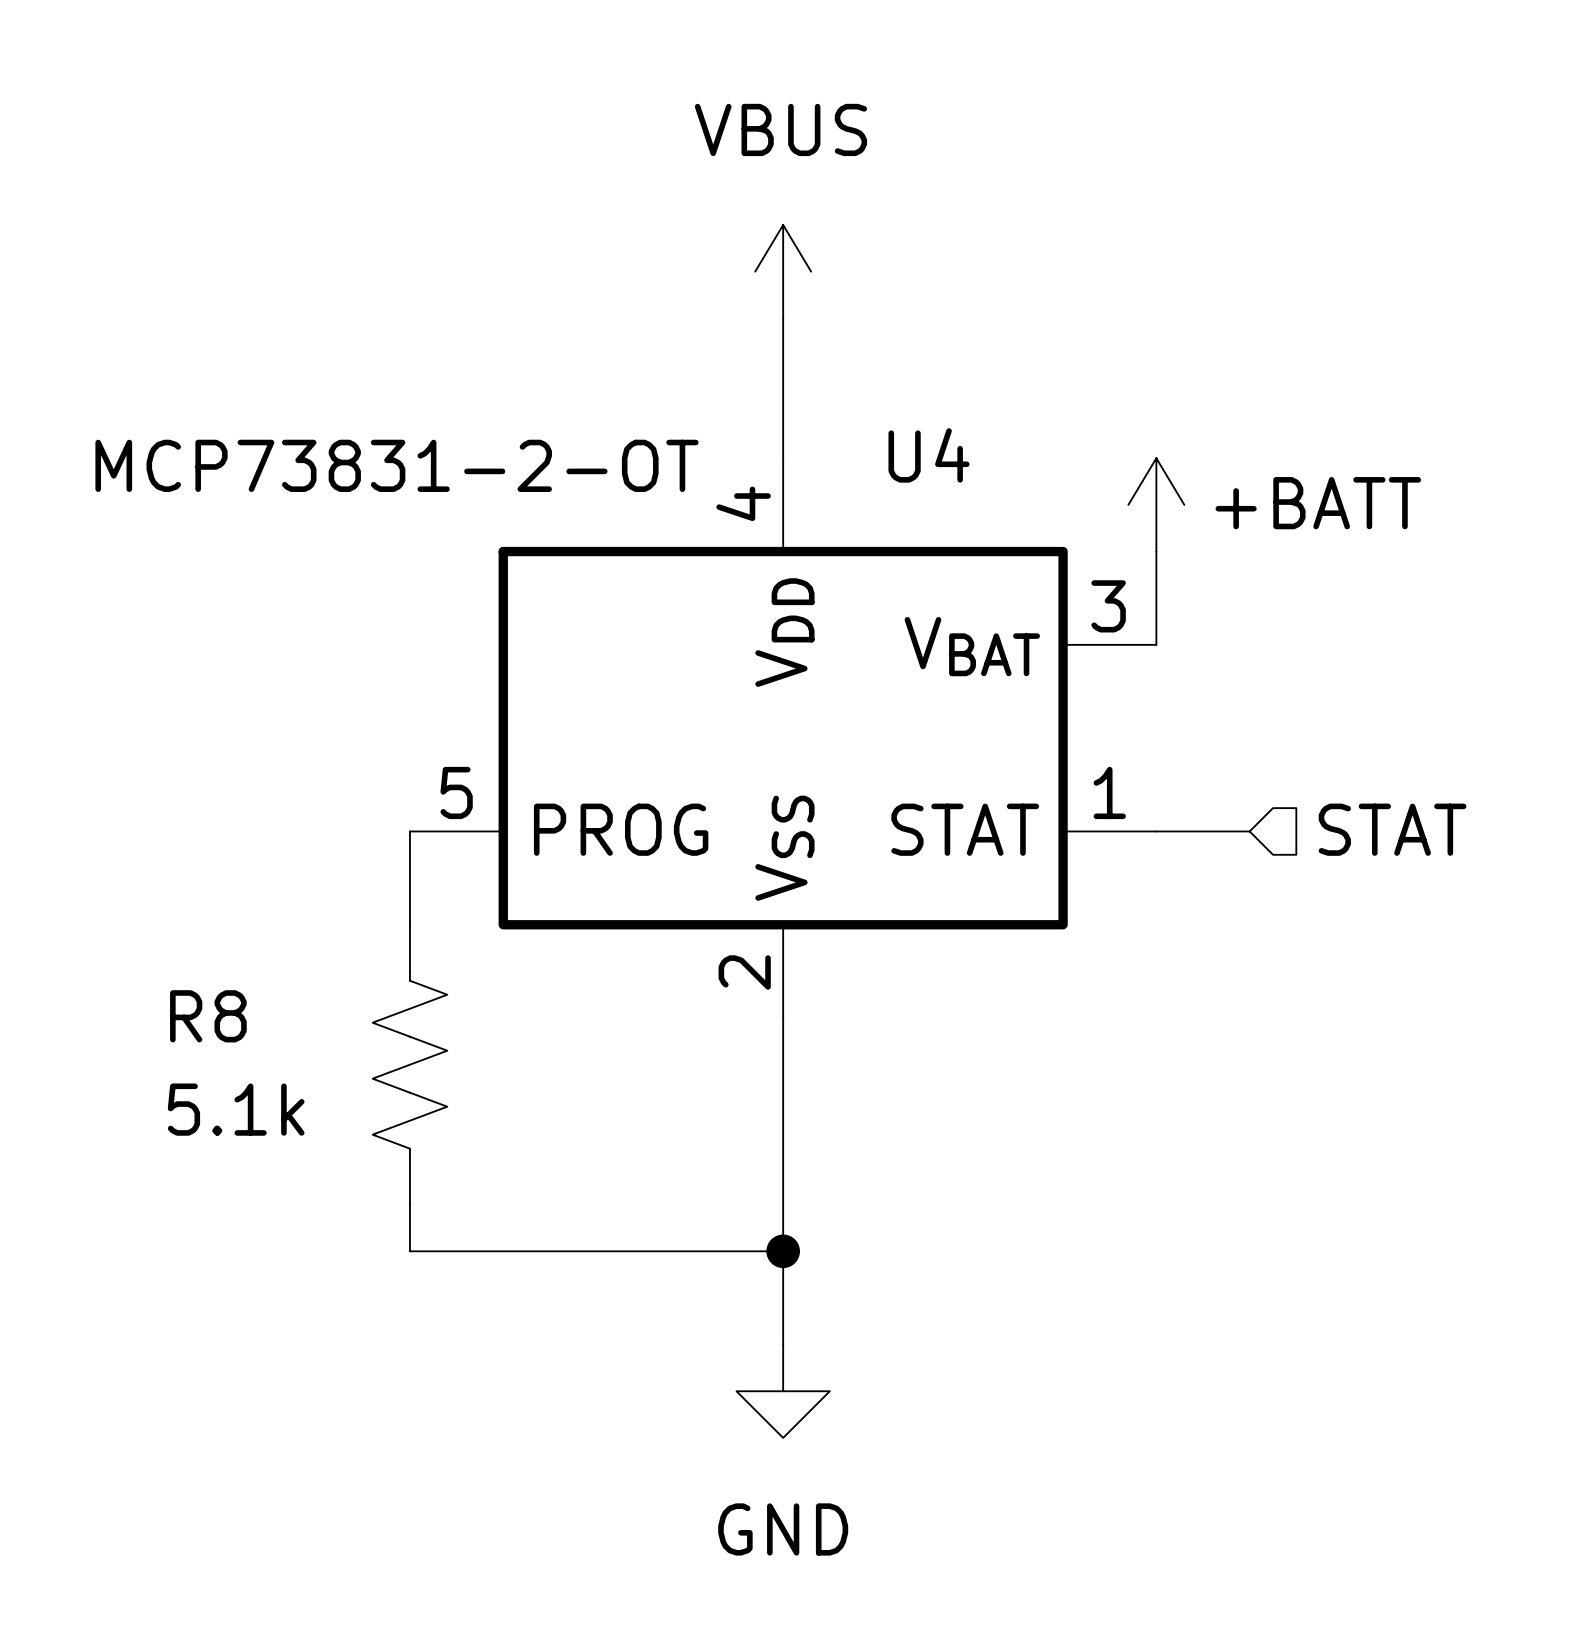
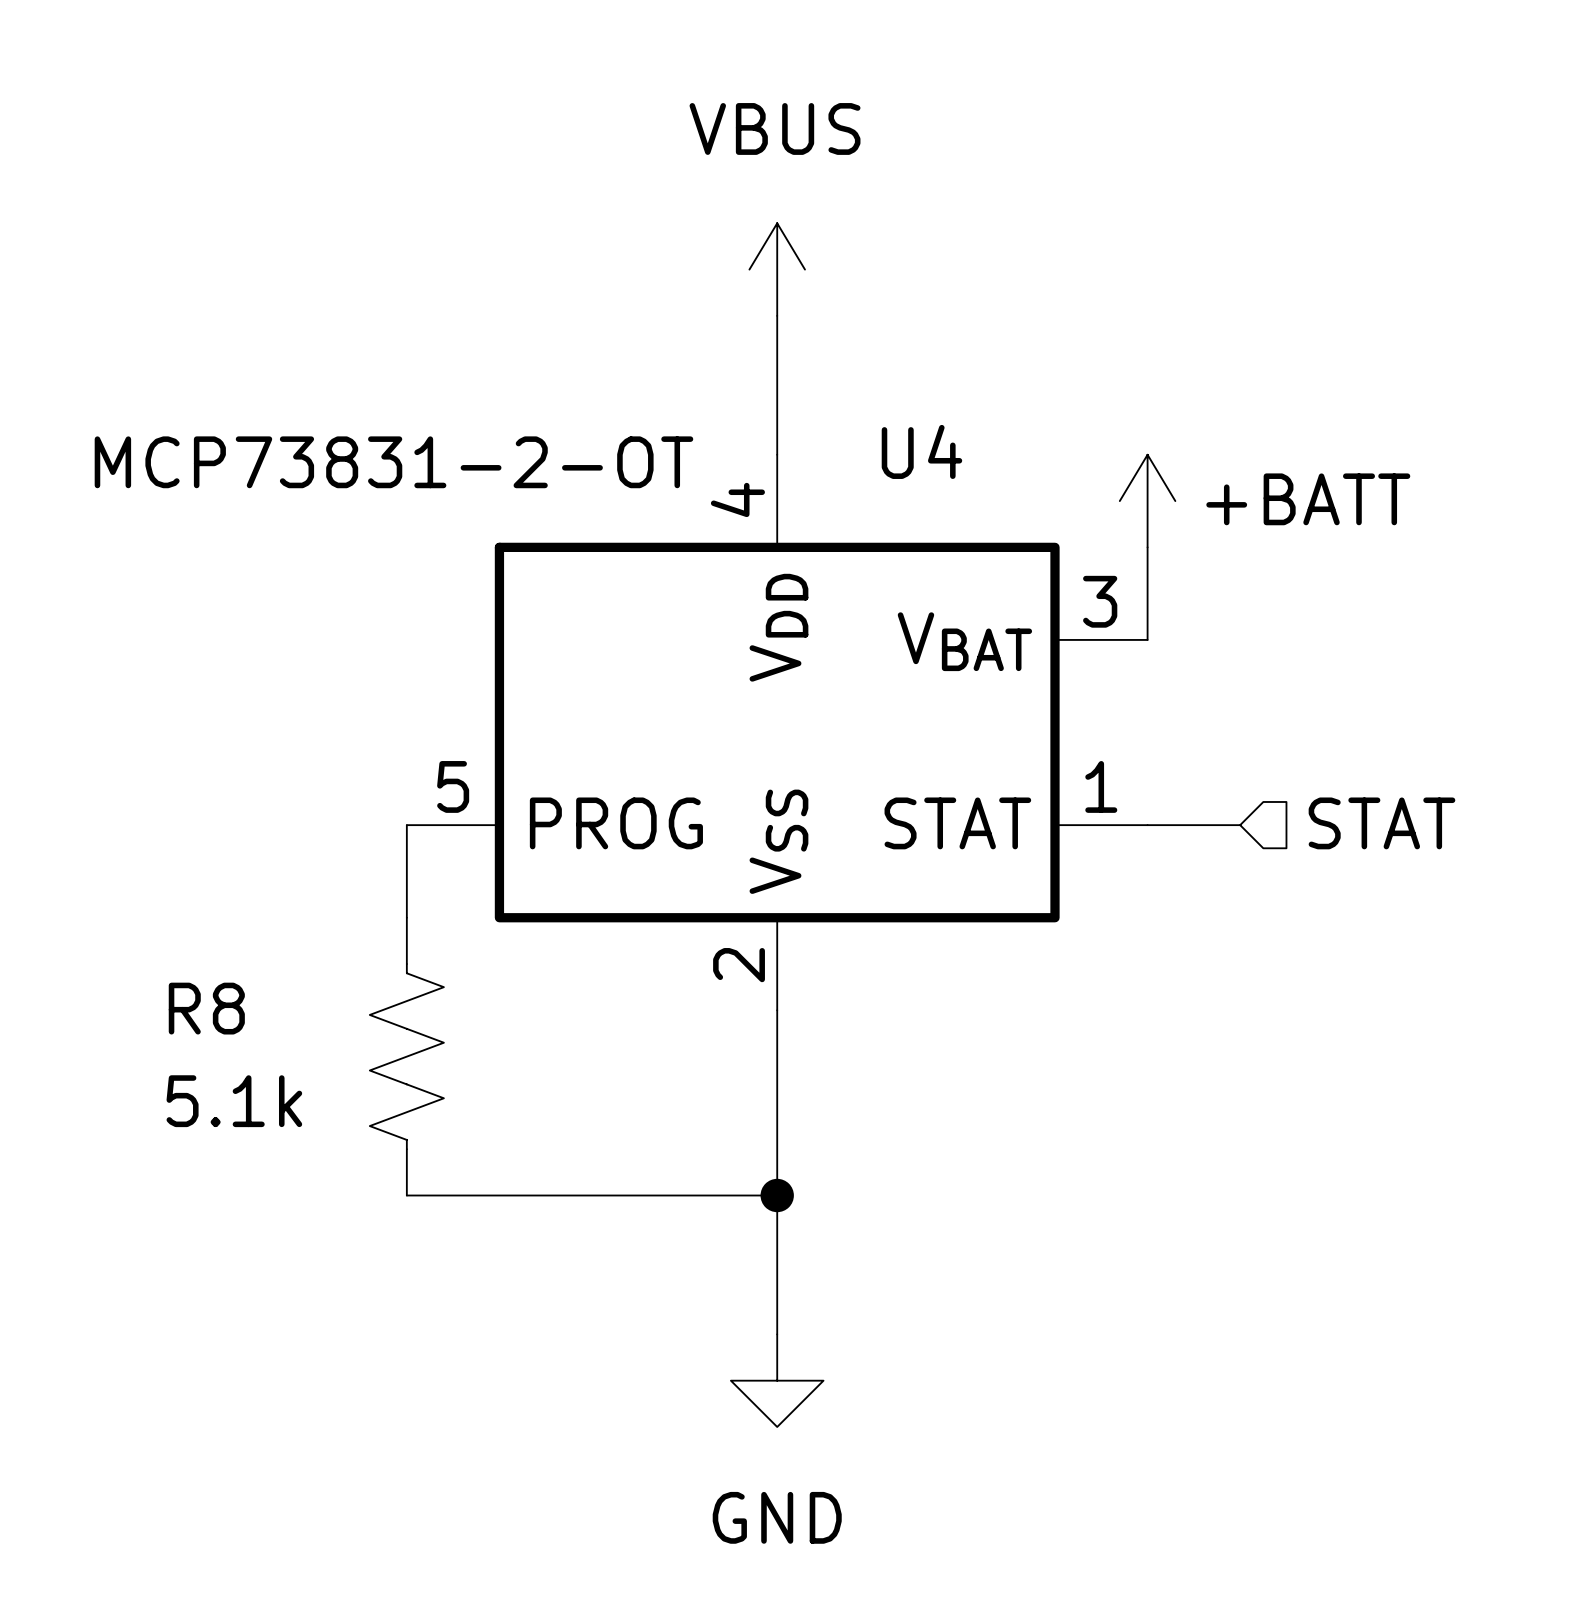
wire: (409, 1204) (409, 1251) (783, 1251) -> (406, 1195) (777, 1195)
junction position: (783, 1251) -> (777, 1195)

